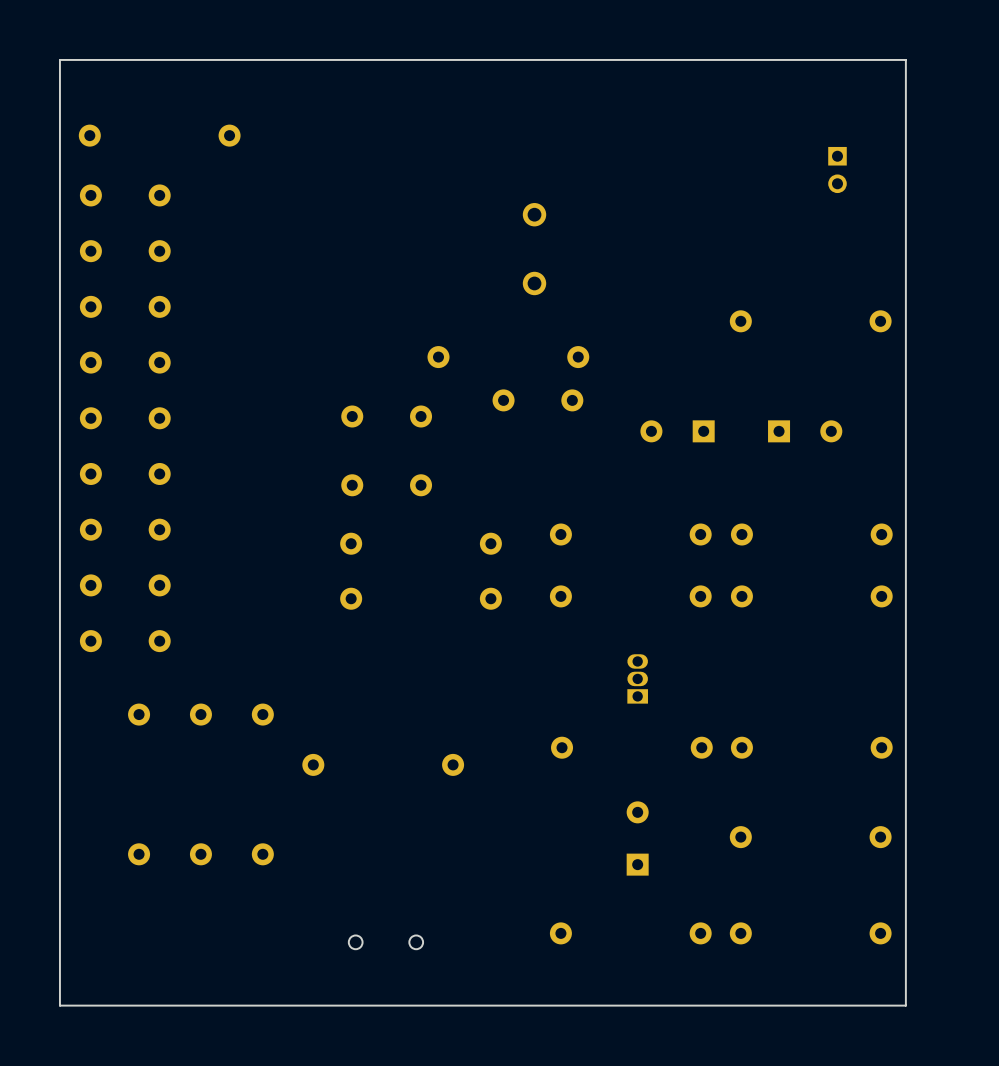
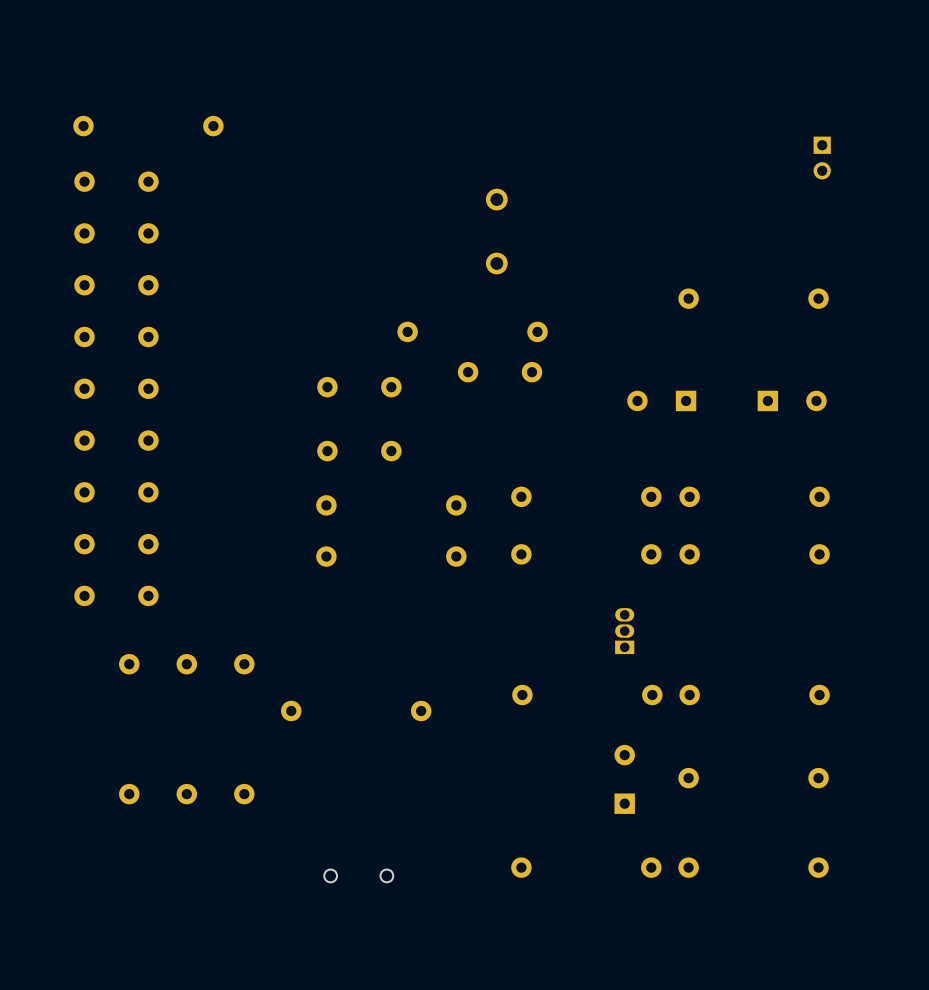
board edge: (905, 59) (59, 59) (59, 1005) (905, 1005) (905, 59) -> none
part position: (837, 170) -> (822, 158)
part position: (677, 431) -> (661, 400)
part: (805, 431) -> none
part: none -> (792, 400)
part position: (637, 678) -> (624, 631)
part position: (637, 838) -> (624, 779)

